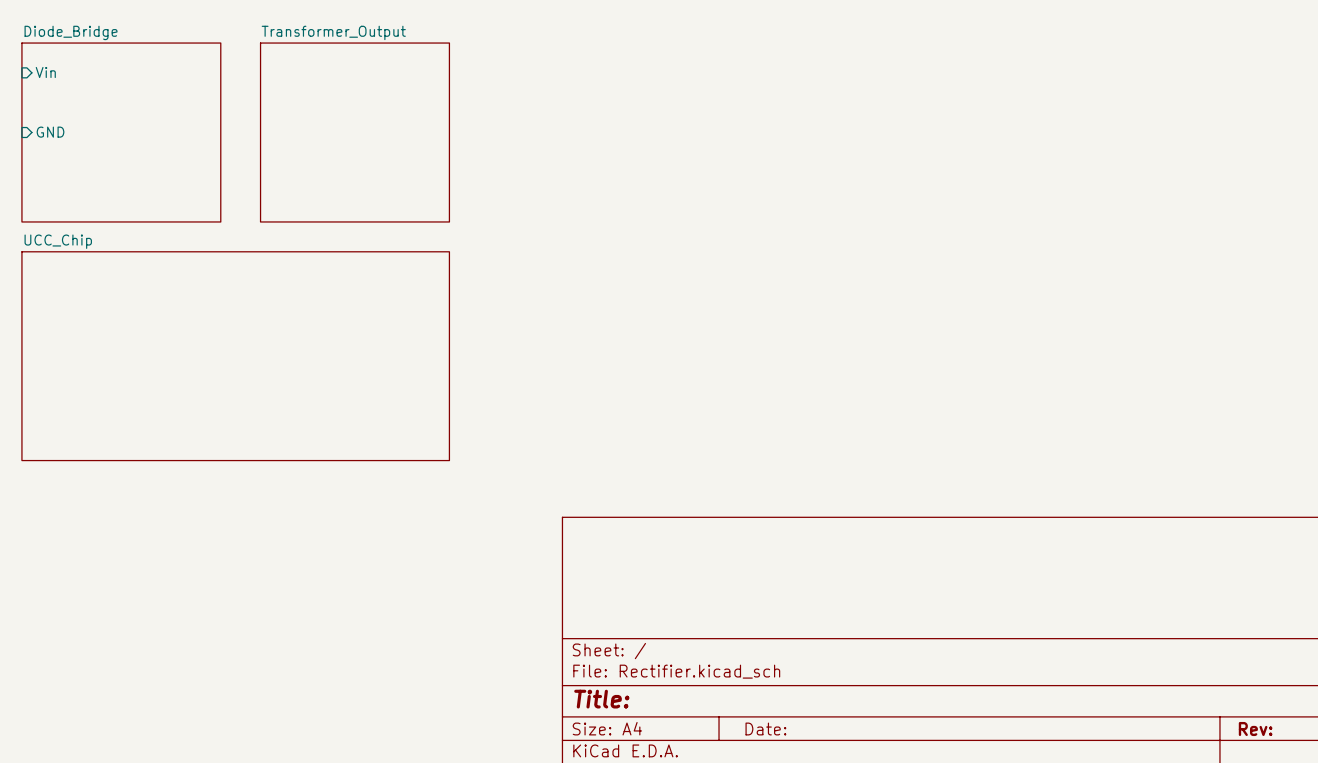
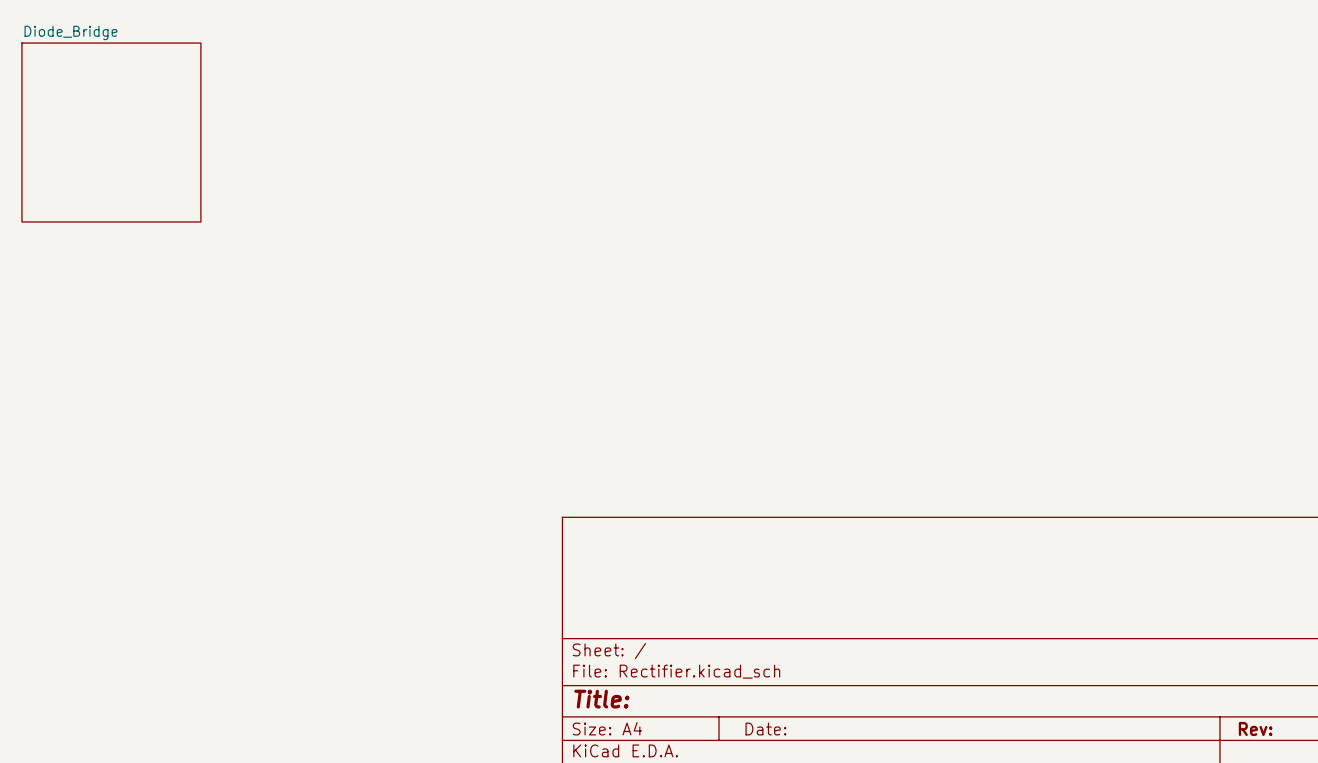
sheet pin: Vin (45, 72) -> none
sheet pin: GND (50, 132) -> none
sheet Diode_Bridge: none -> (111, 132)
sheet Diode_Bridge: (121, 132) -> none
sheet Transformer_Output: (354, 132) -> none
sheet UCC_Chip: (235, 356) -> none

